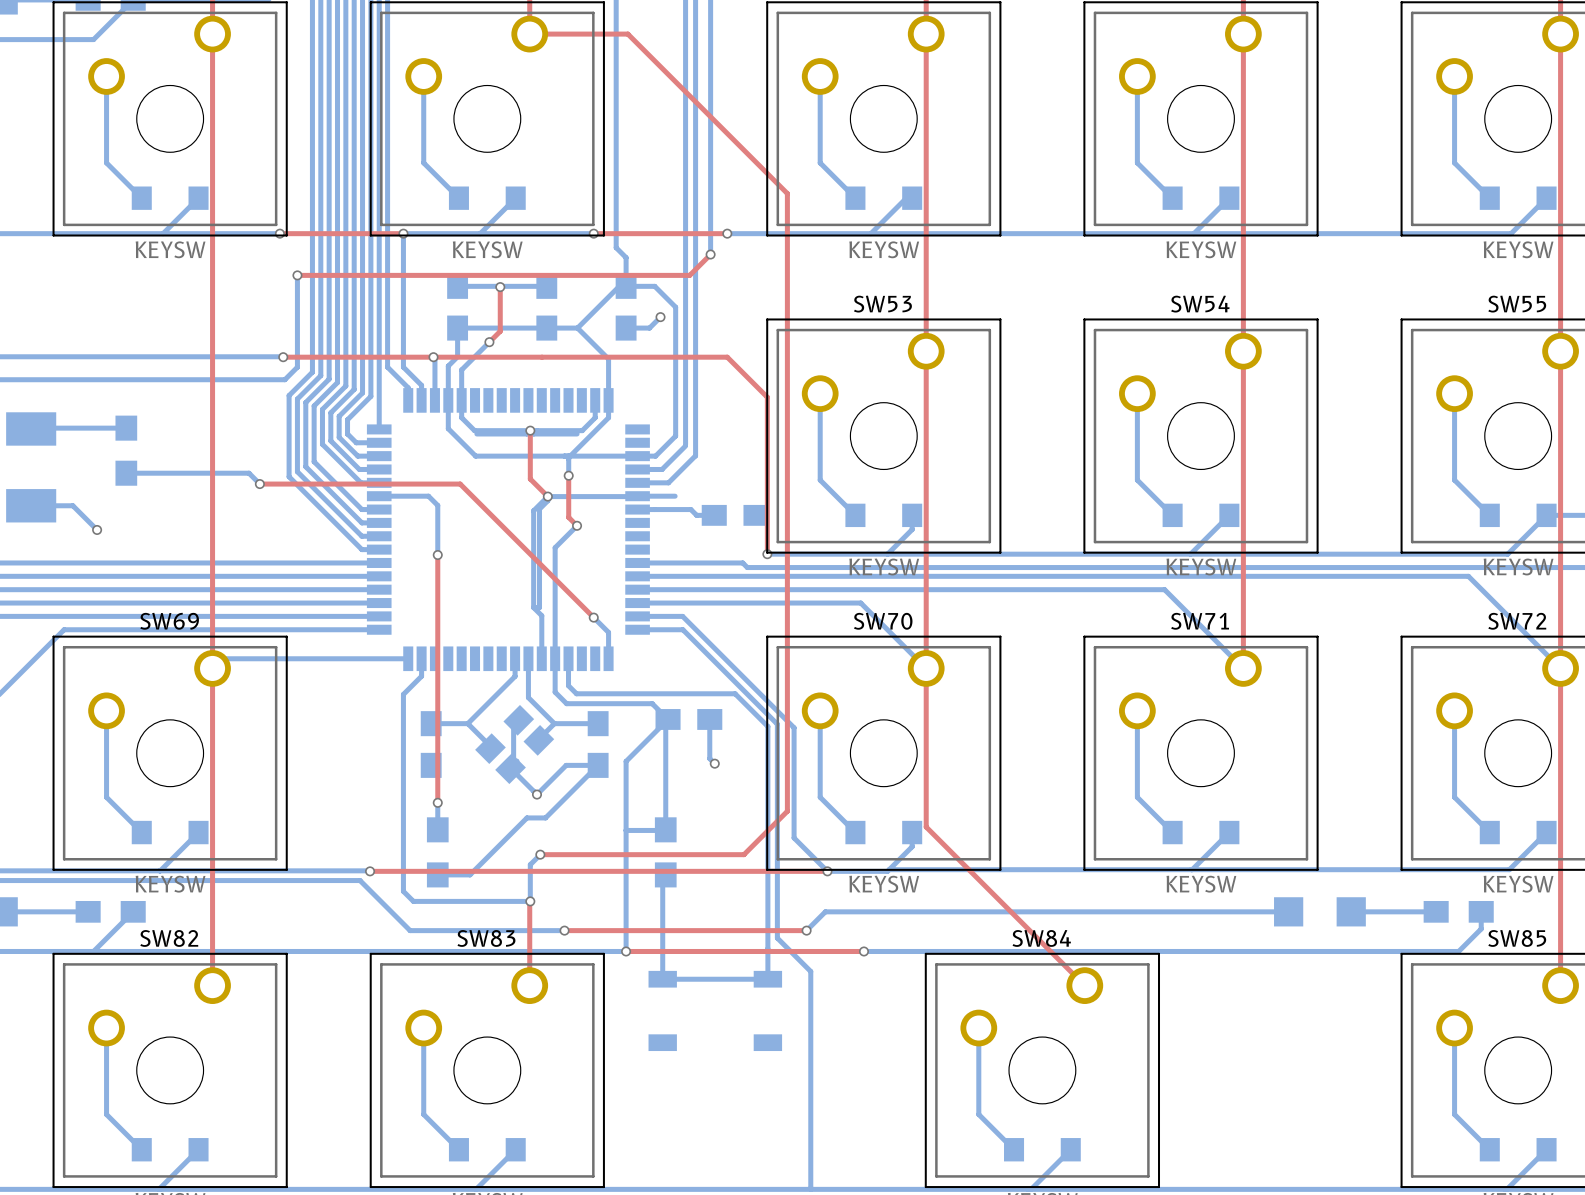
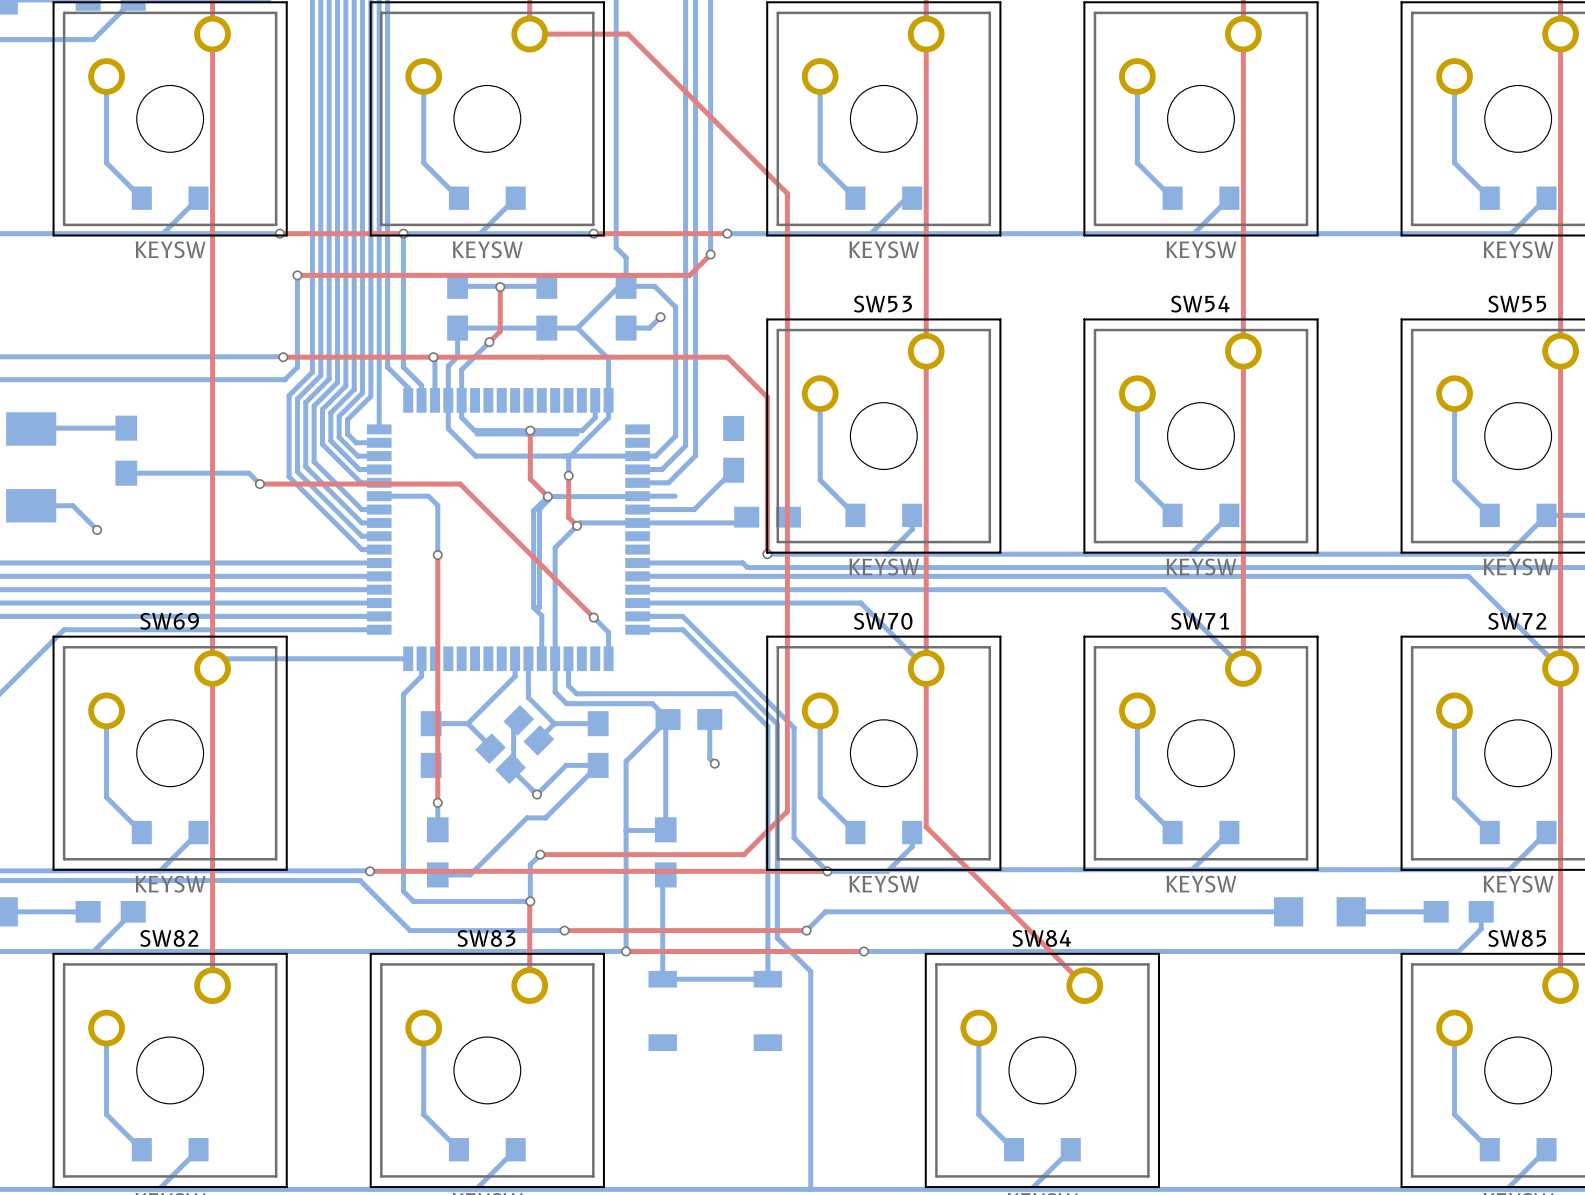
part: none -> (733, 449)
bottom track: (690, 509) (696, 515) (714, 515) -> (690, 509) (694, 509) (733, 470)
part position: (735, 515) -> (767, 517)
bottom track: none -> (746, 517) (740, 522) (579, 522) (577, 525)

